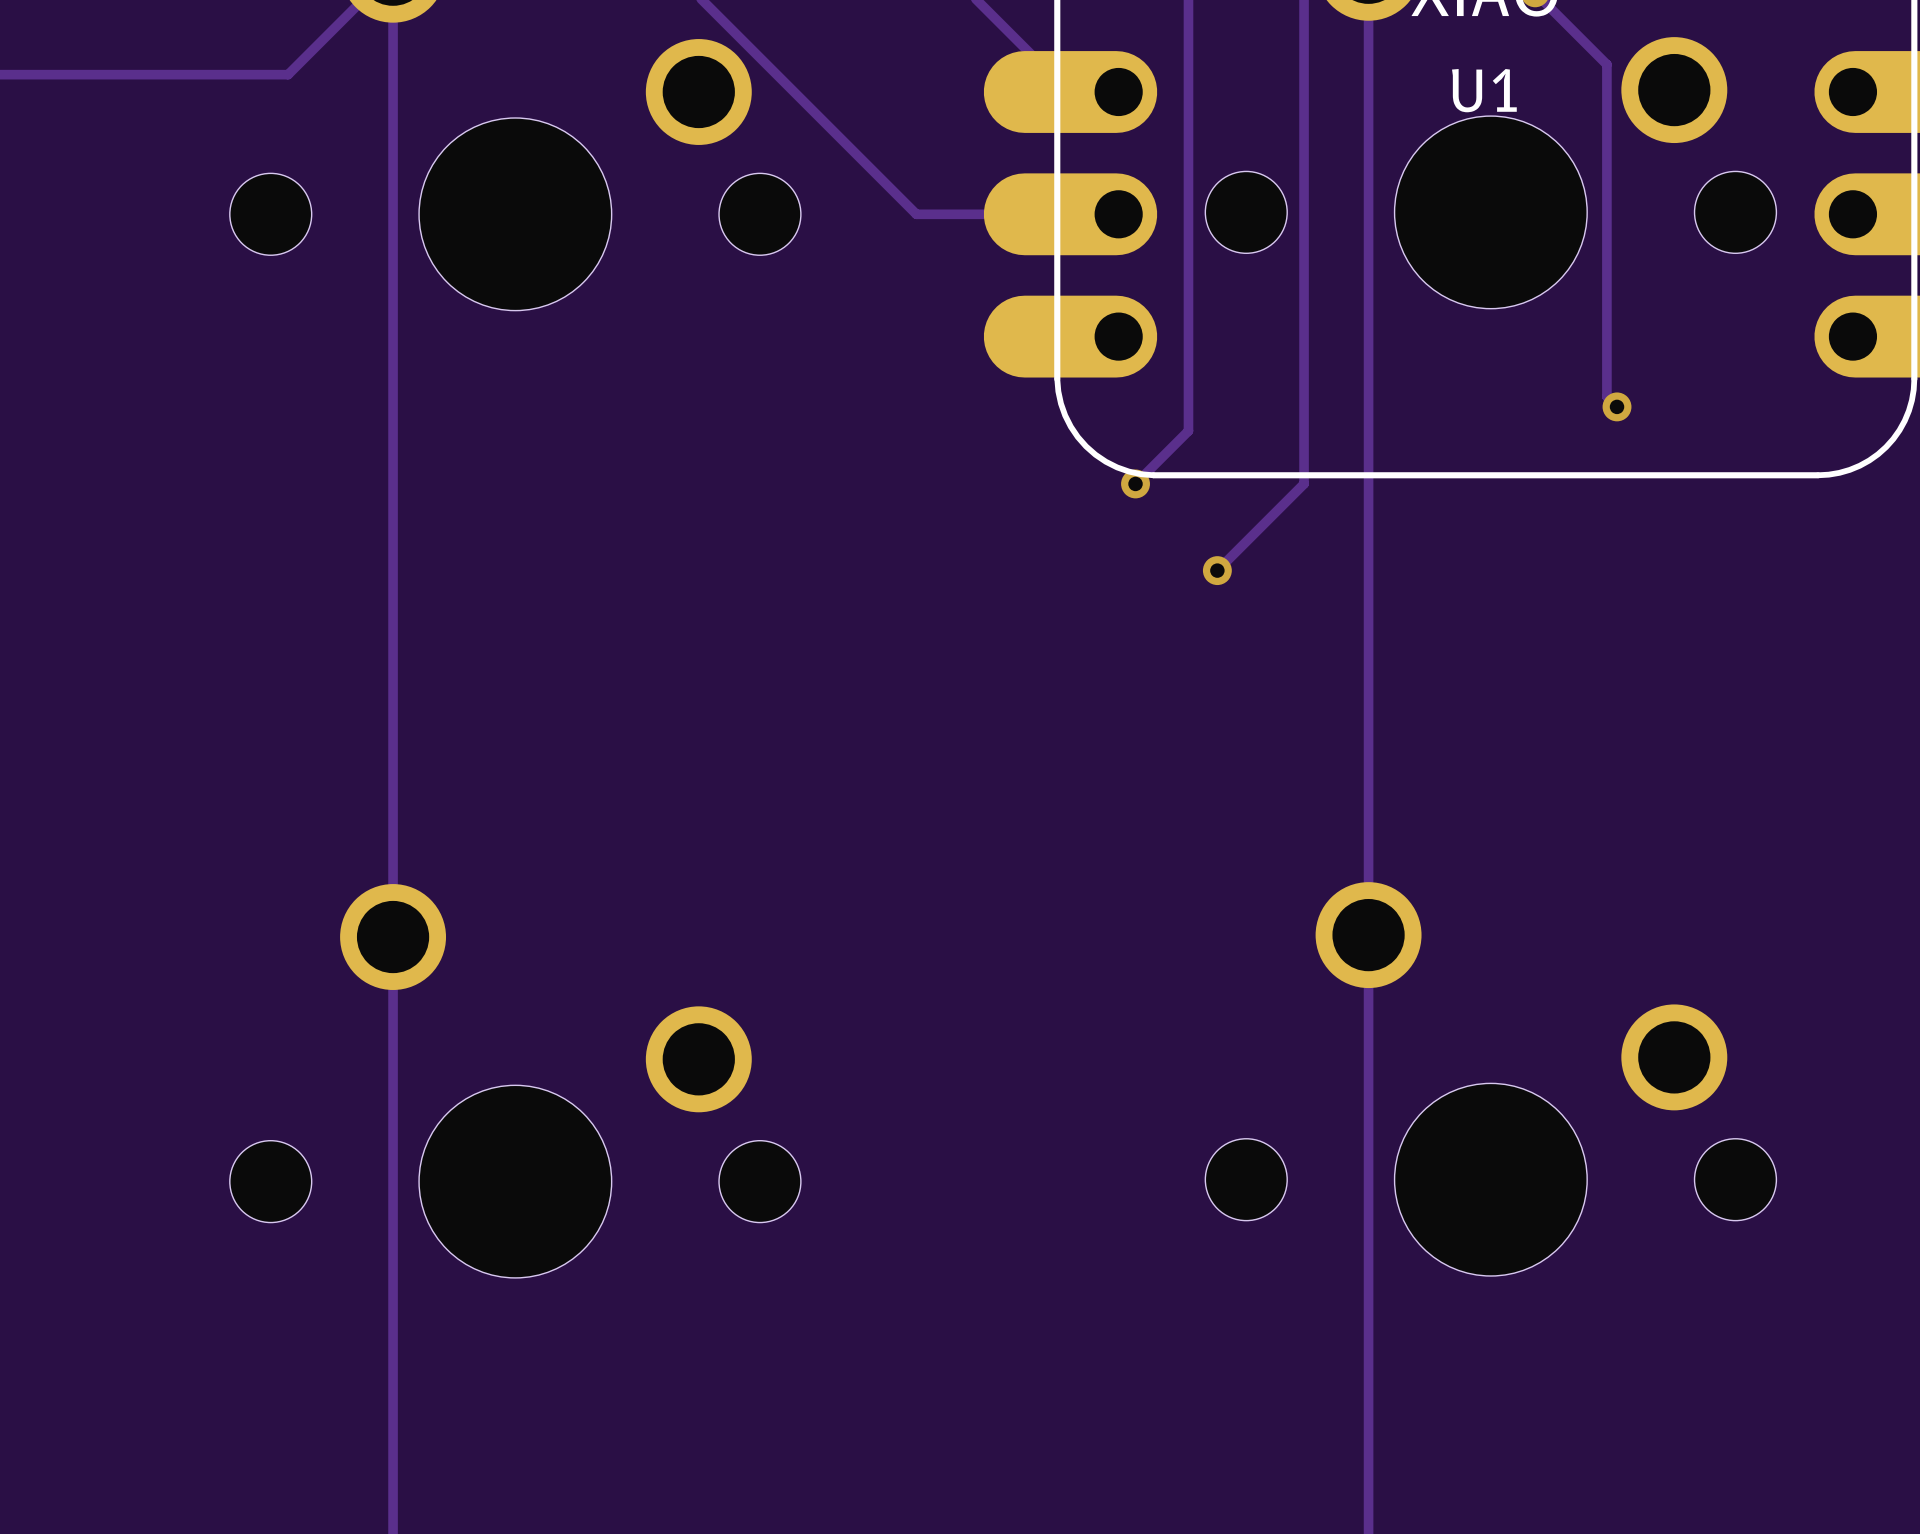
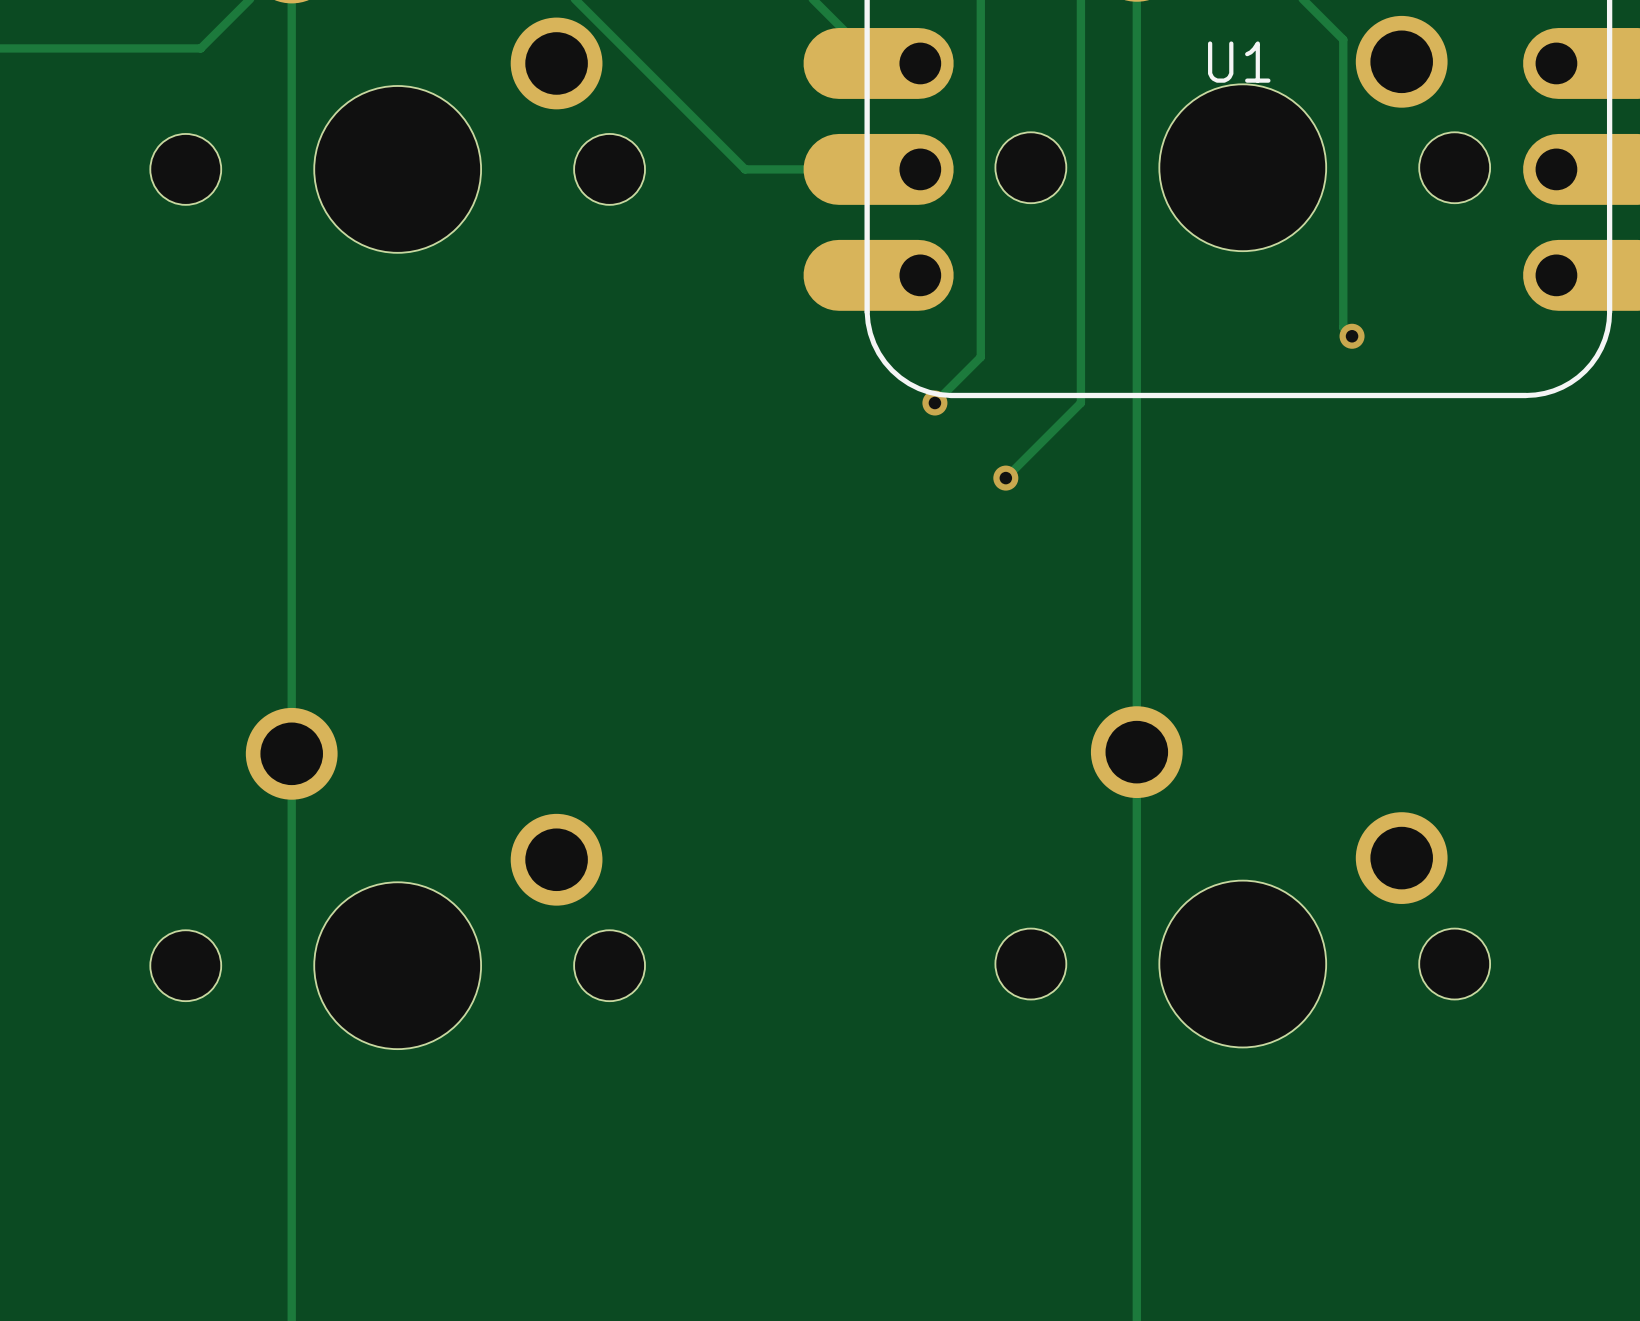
part position: (1490, 1079) -> (1242, 876)
part position: (515, 1080) -> (397, 878)

